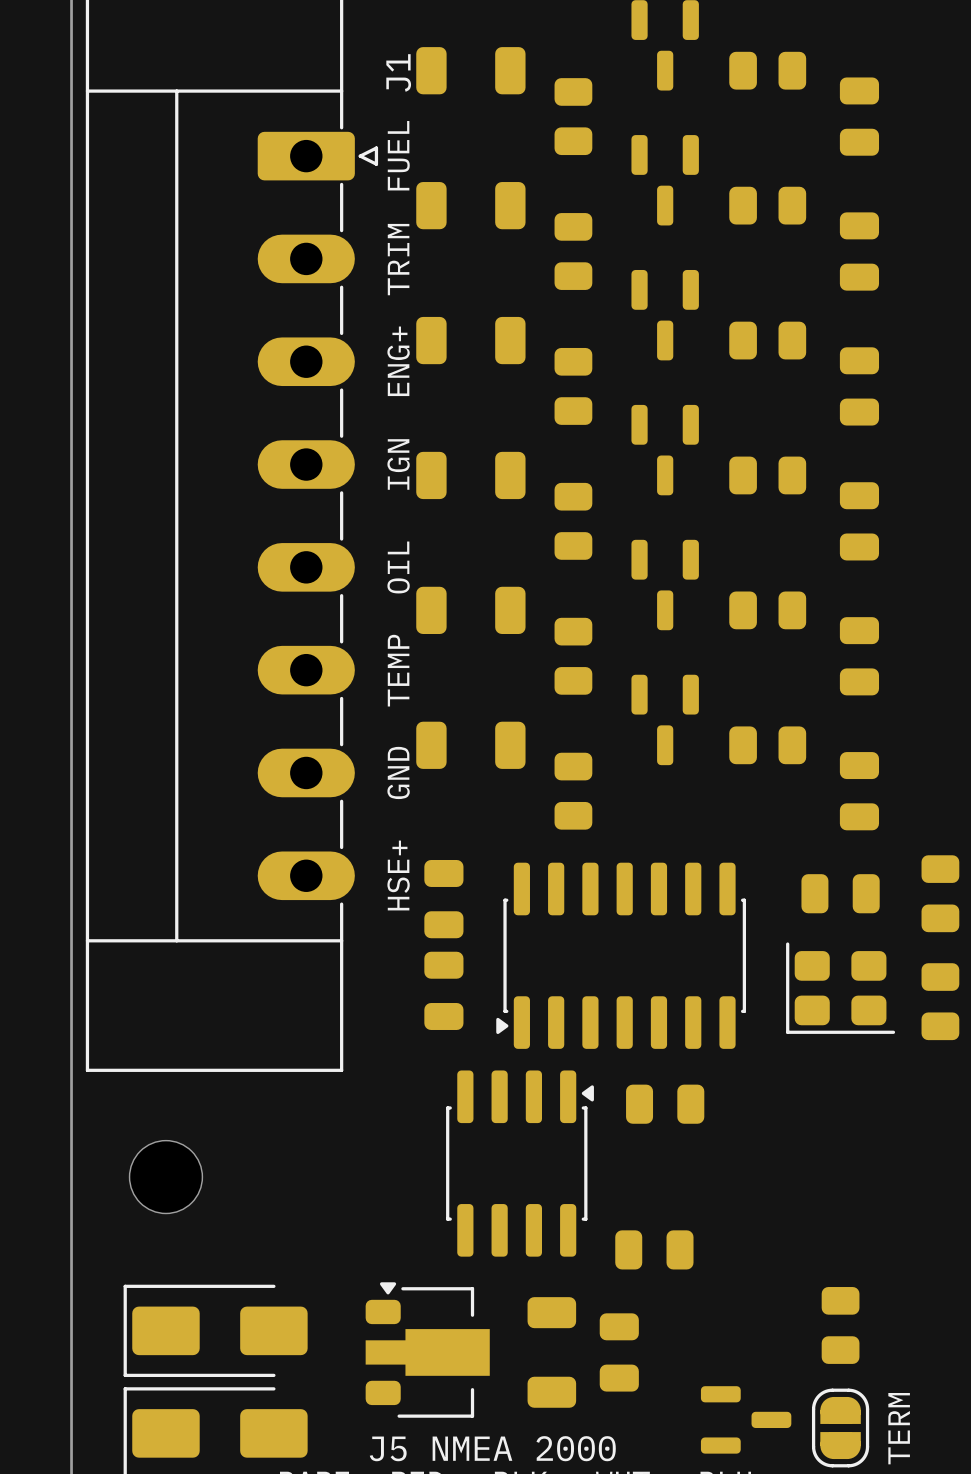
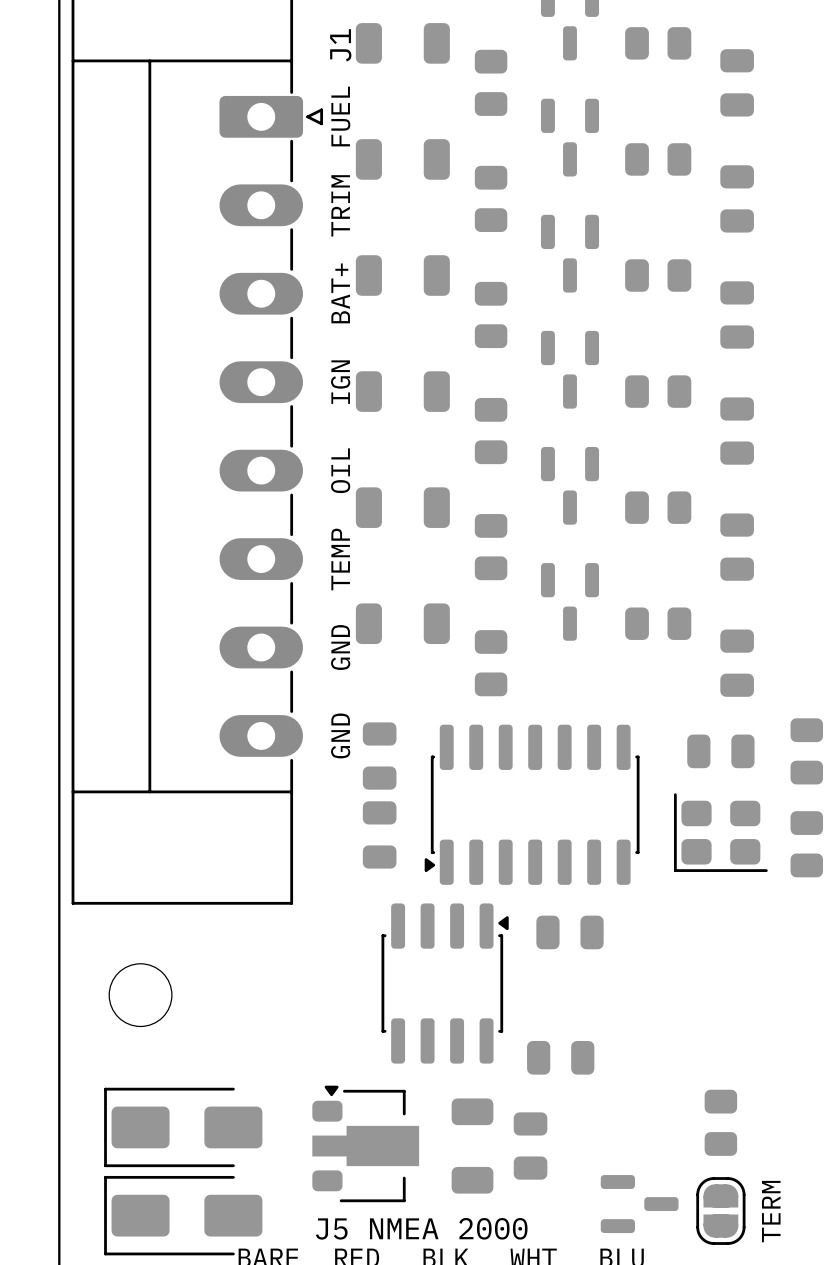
text: ENG+ (398, 361) -> BAT+ (340, 293)
text: HSE+ (398, 875) -> GND (340, 735)

